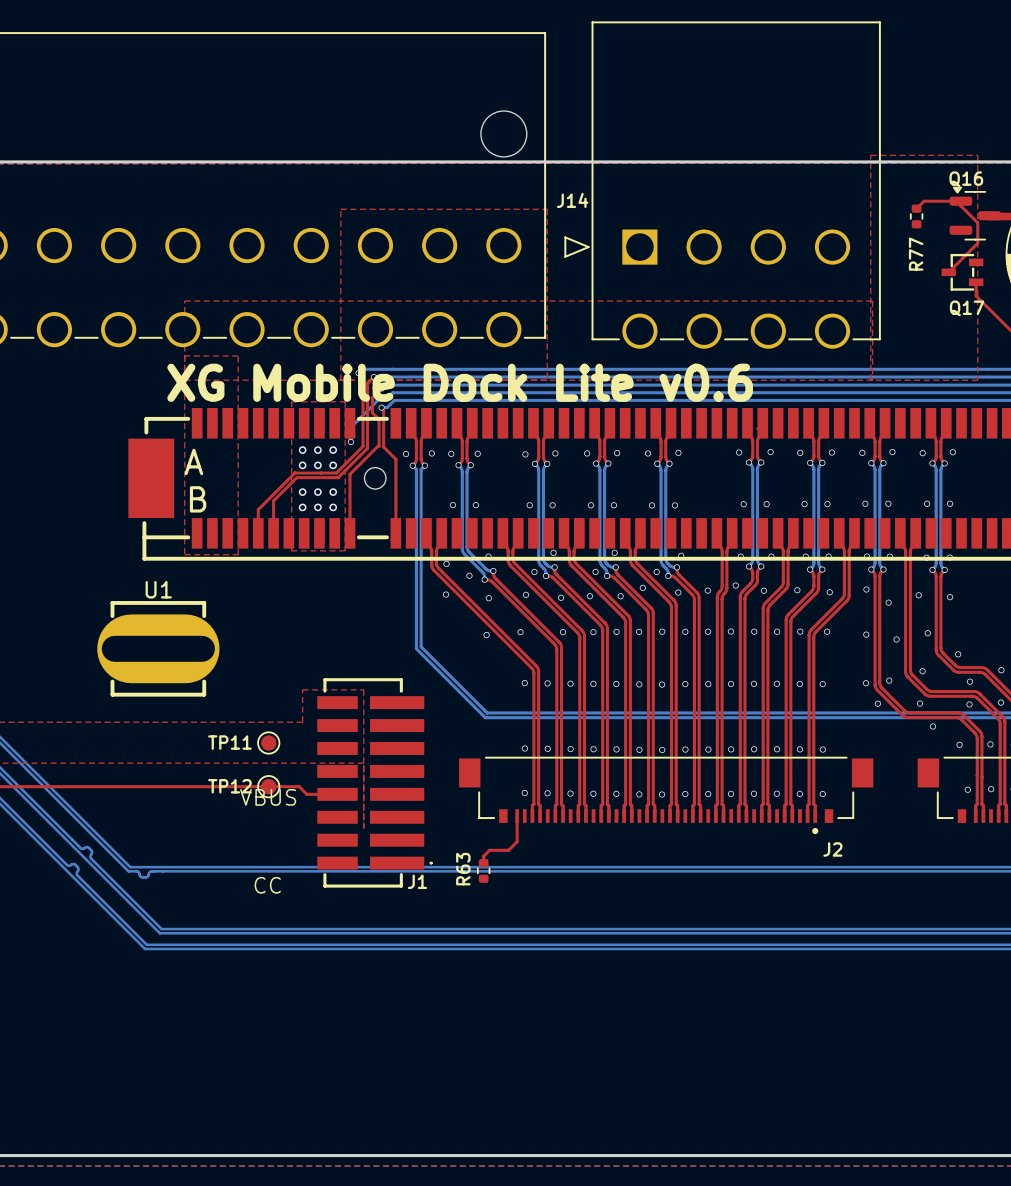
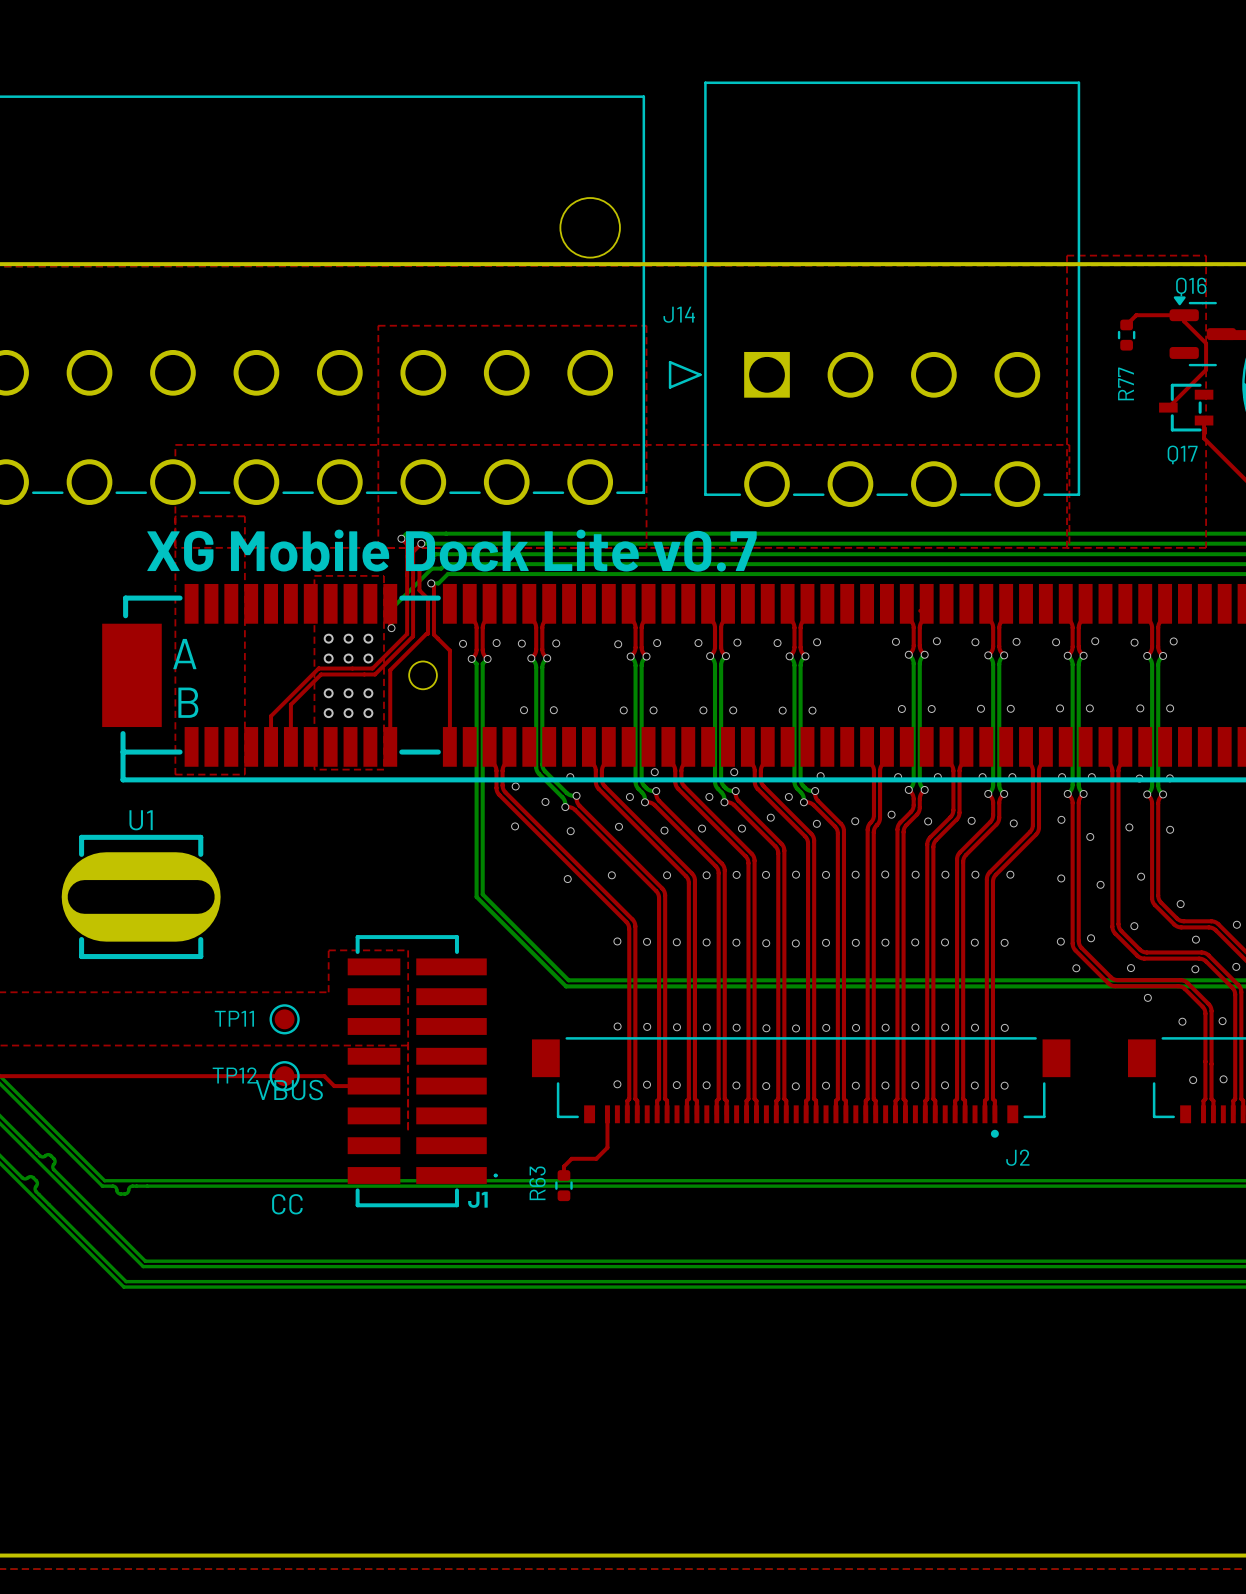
text: XG Mobile Dock Lite v0.6 (460, 382) -> XG Mobile Dock Lite v0.7 (451, 550)

